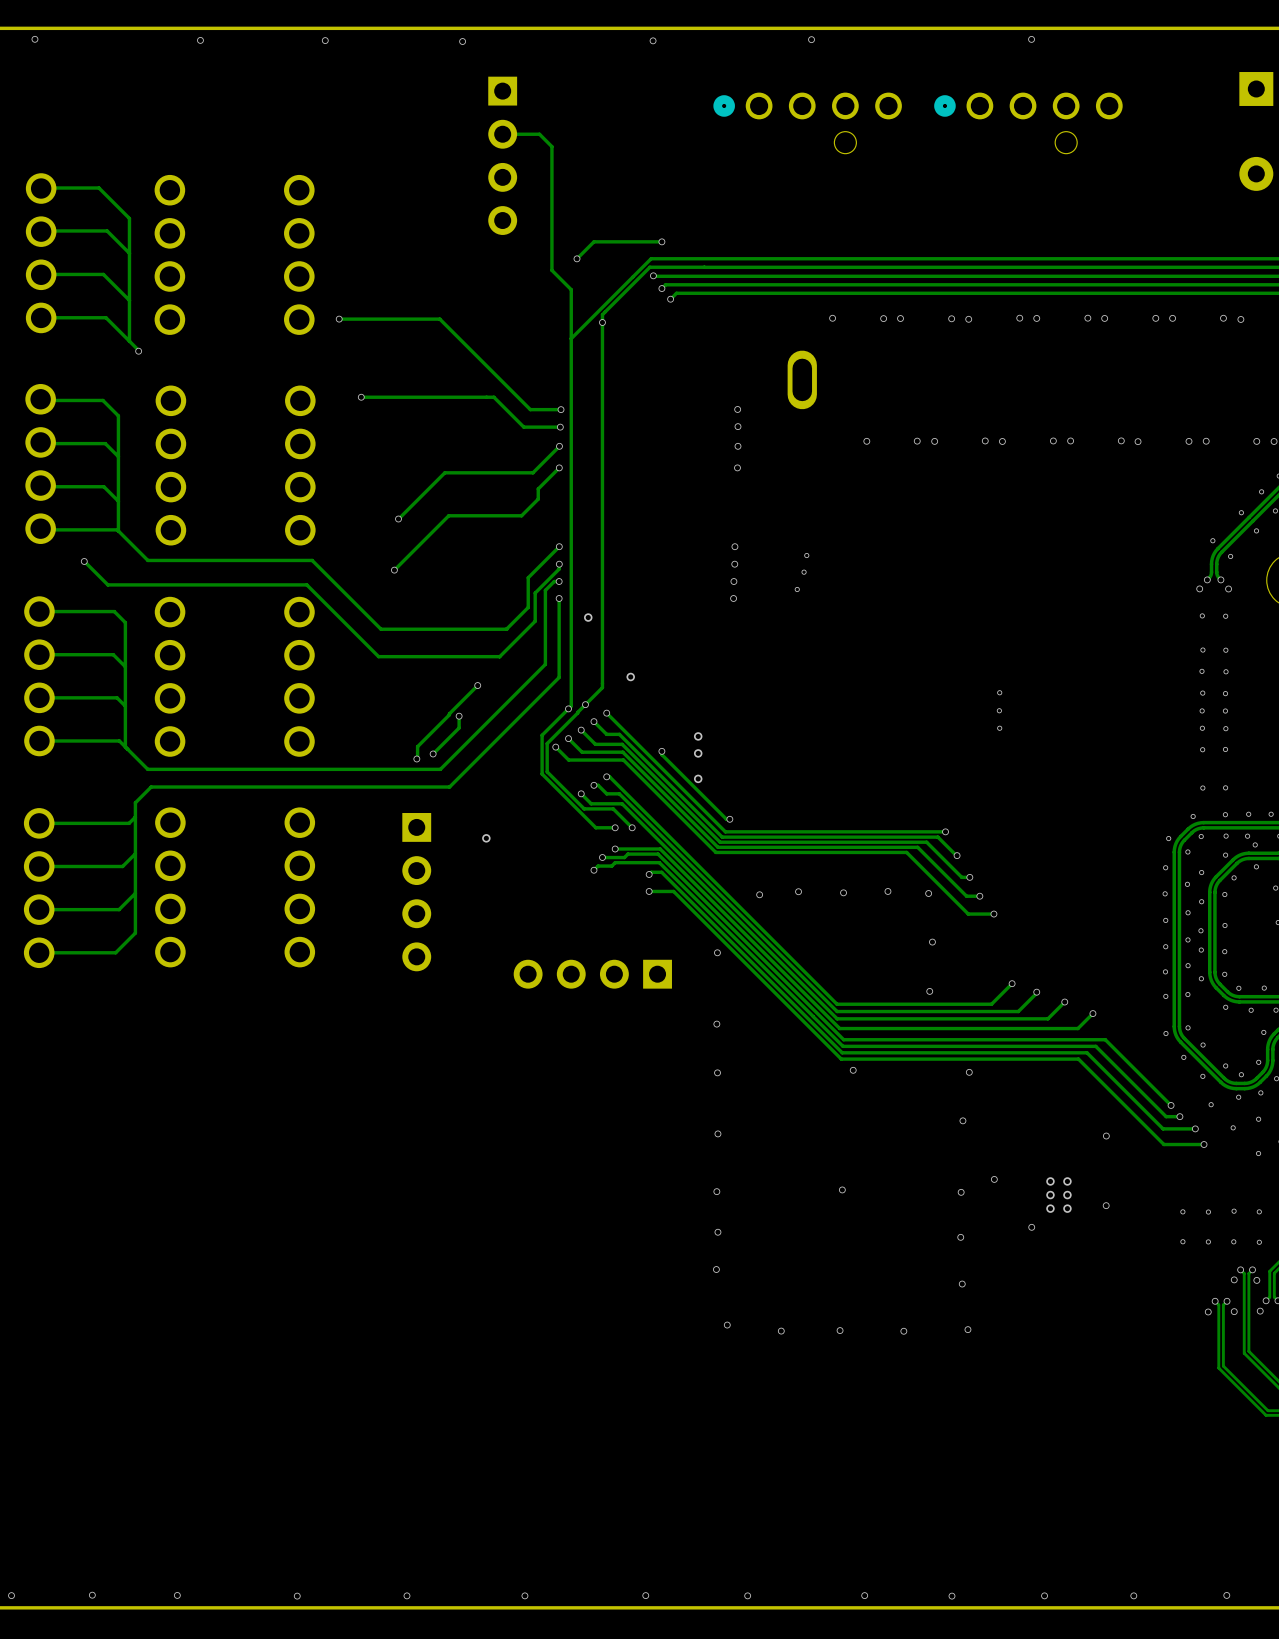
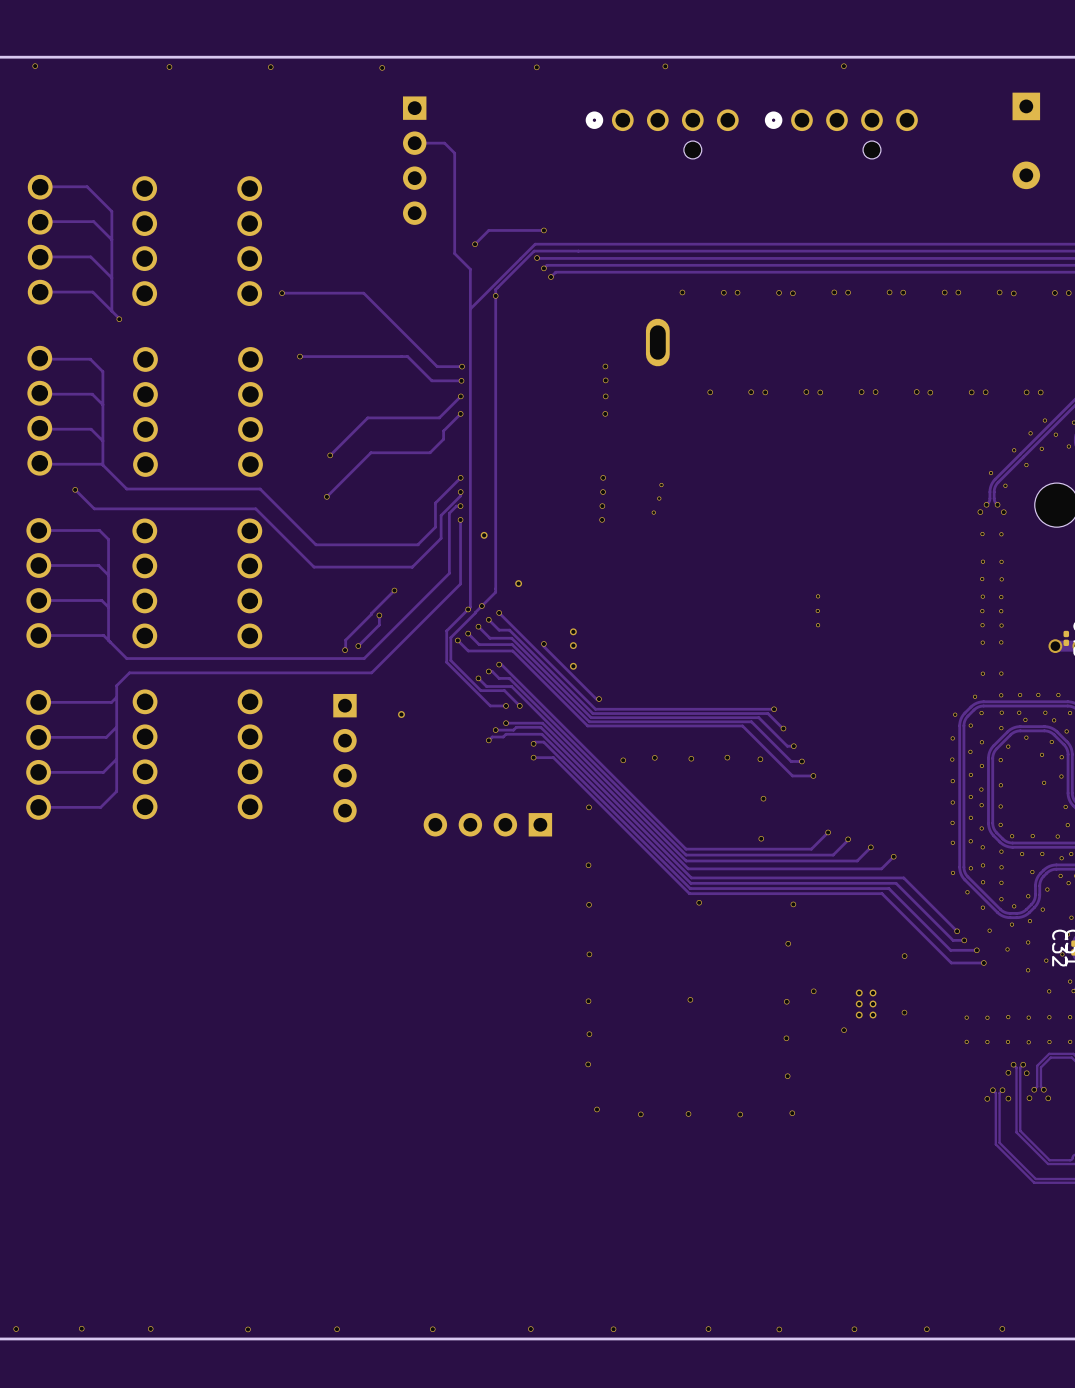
via: none -> (982, 847)
via: none -> (983, 865)
via: none -> (1001, 867)
via: none -> (1001, 882)

